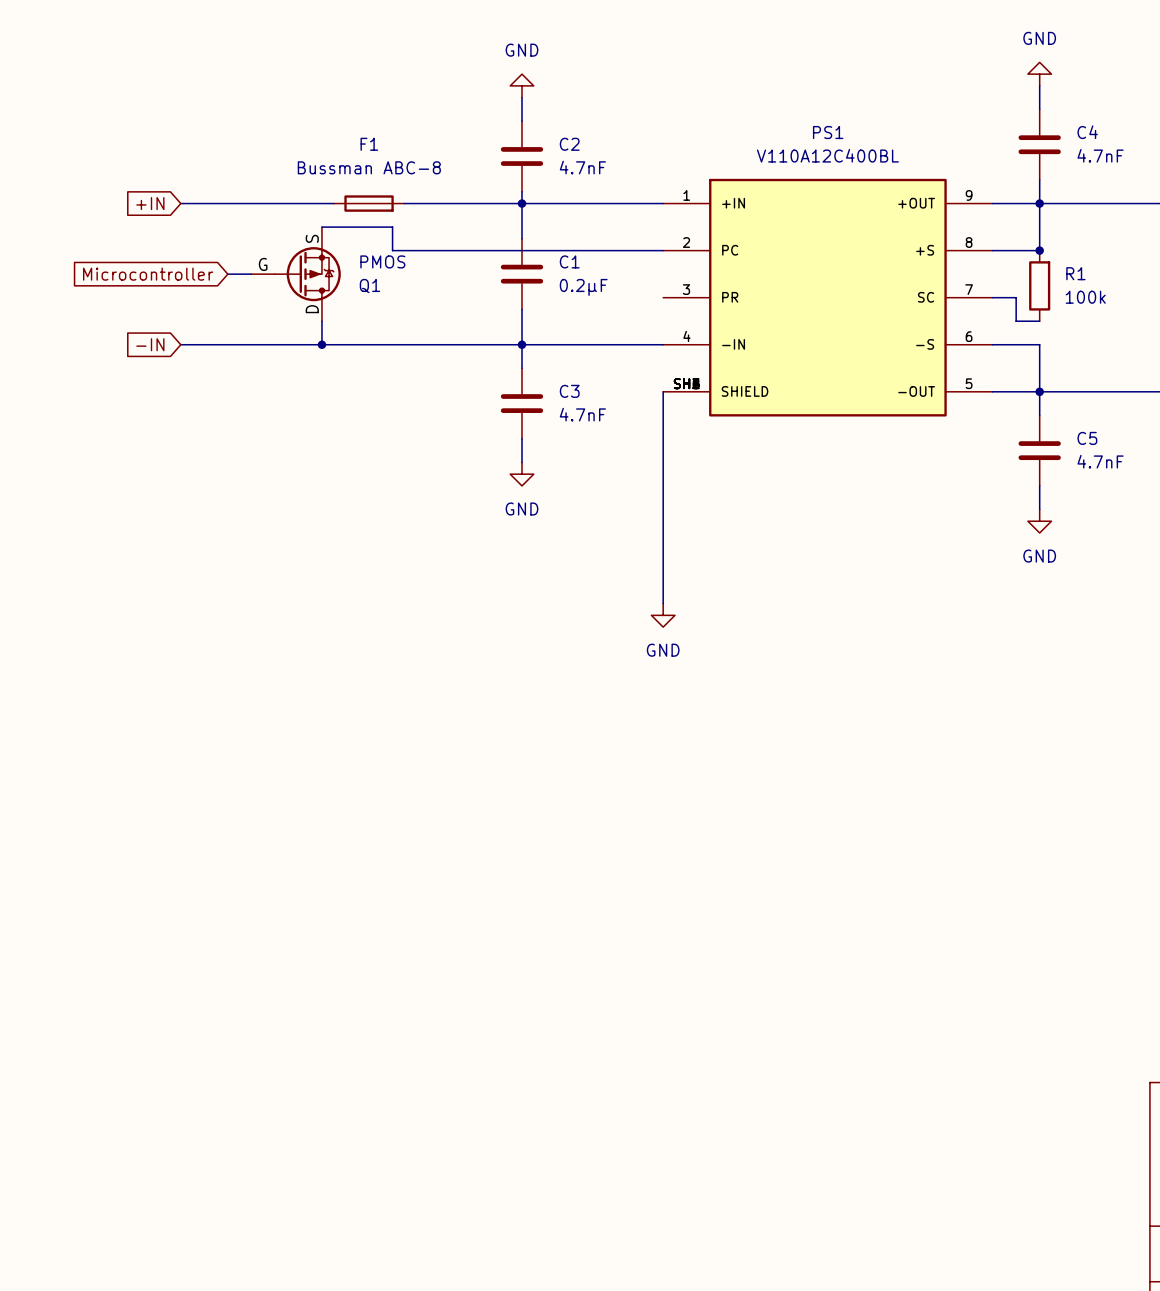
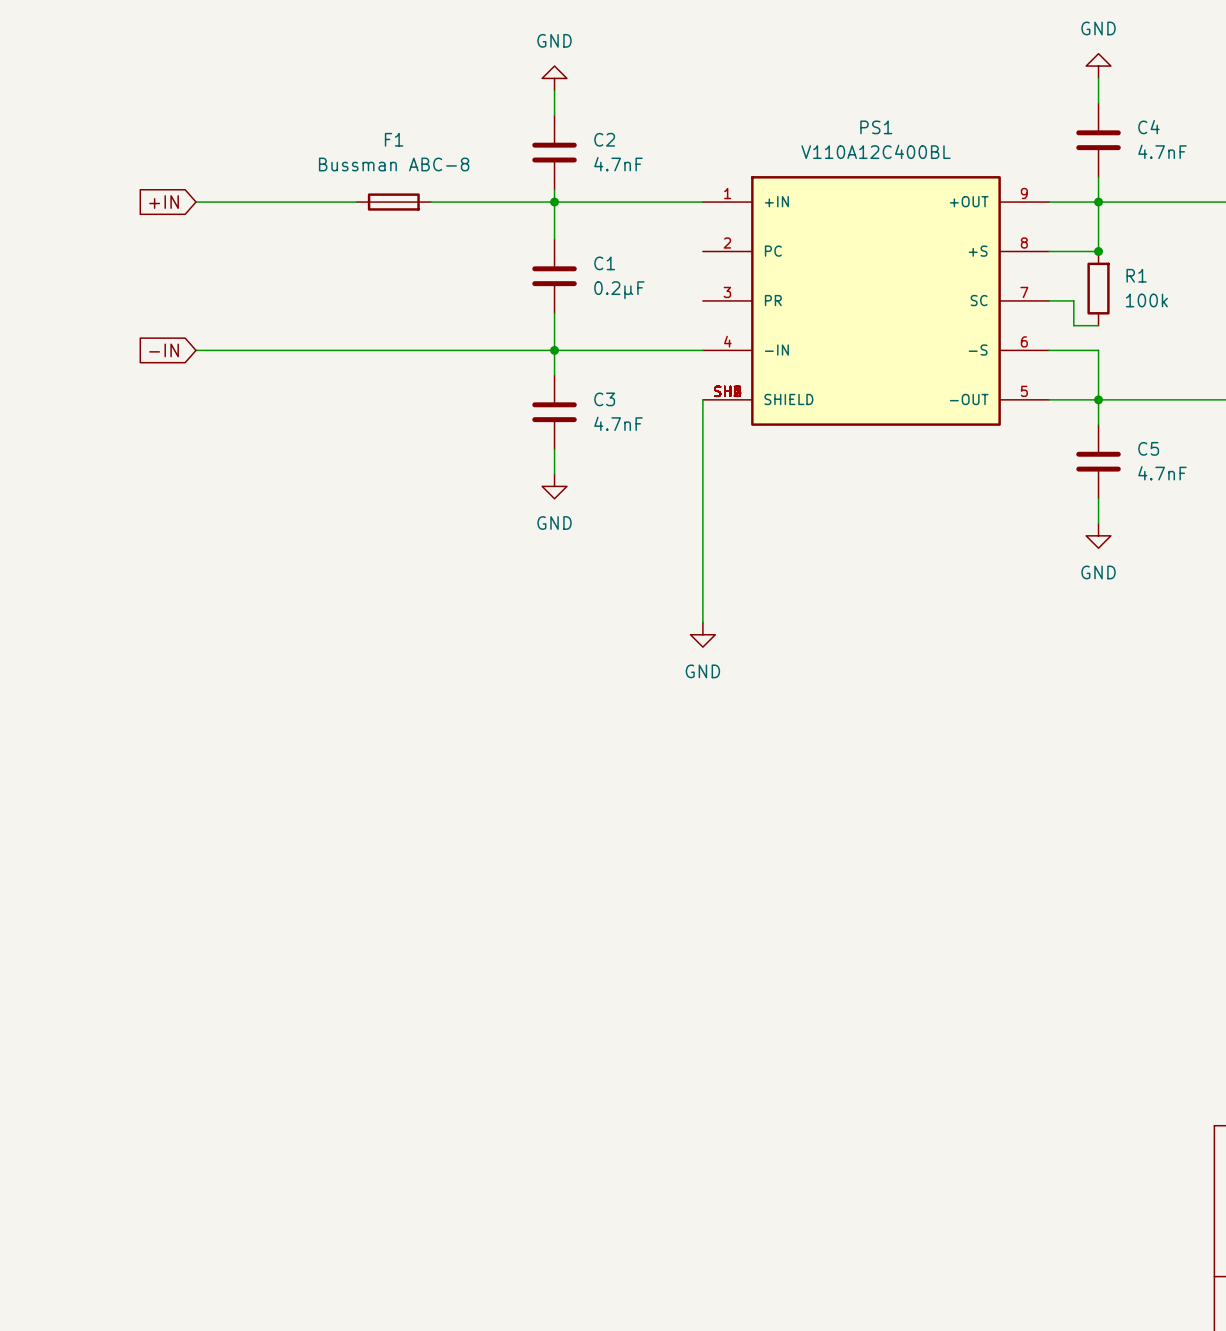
wire: (321, 227) (392, 227) (392, 250) (663, 250) -> none
global label: Microcontroller (148, 274) -> none
wire: (227, 274) (251, 274) -> none
Q1: PMOS (296, 274) -> none
wire: (321, 321) (321, 344) -> none
junction: (321, 344) -> none

